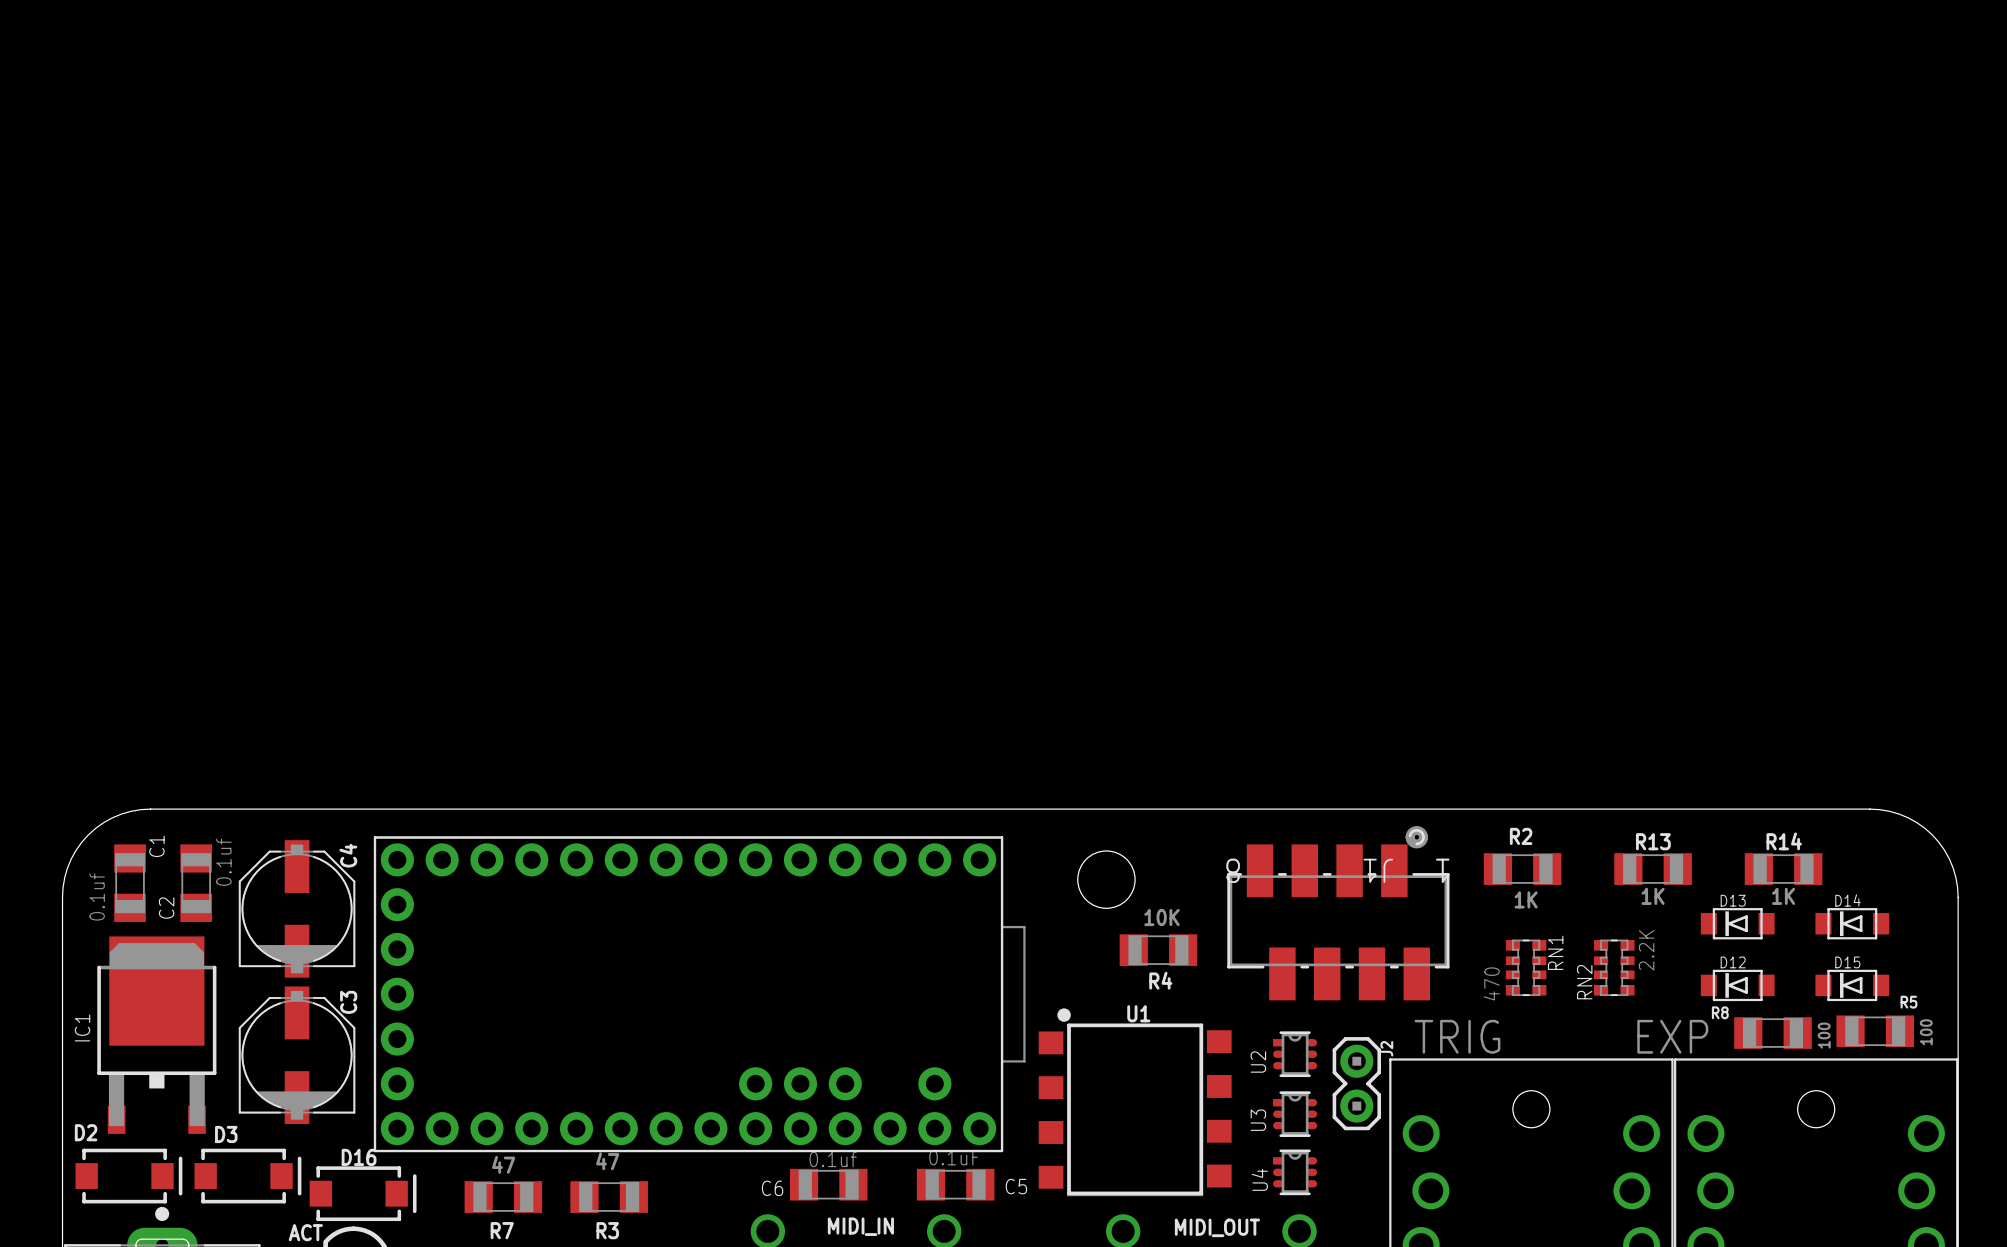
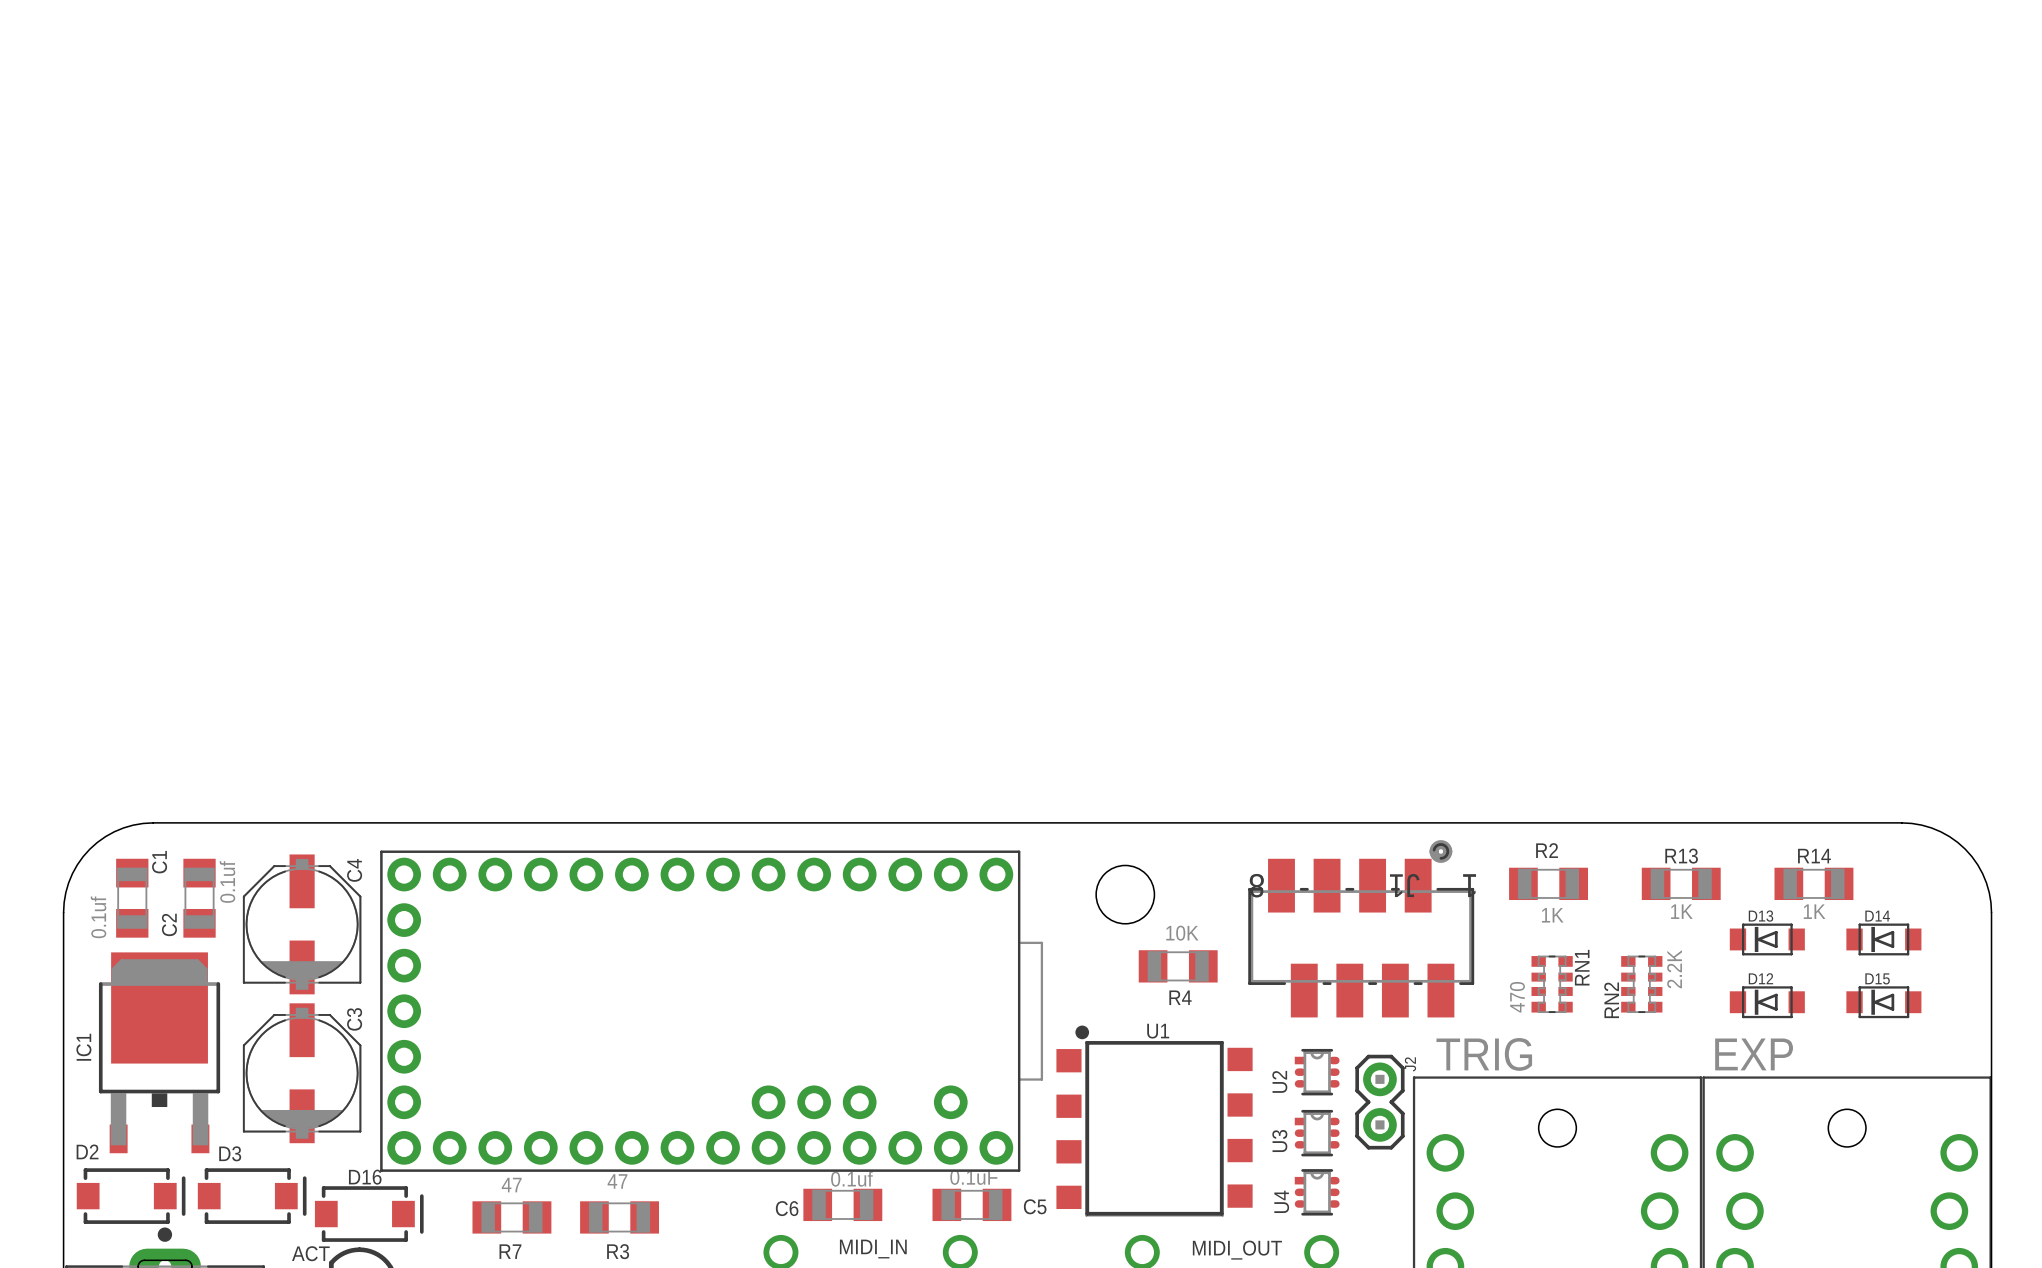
R5: 100 (1875, 1031) -> none
R8: 100 (1772, 1033) -> none
text position: EXP (1672, 1036) -> EXP (1754, 1054)

